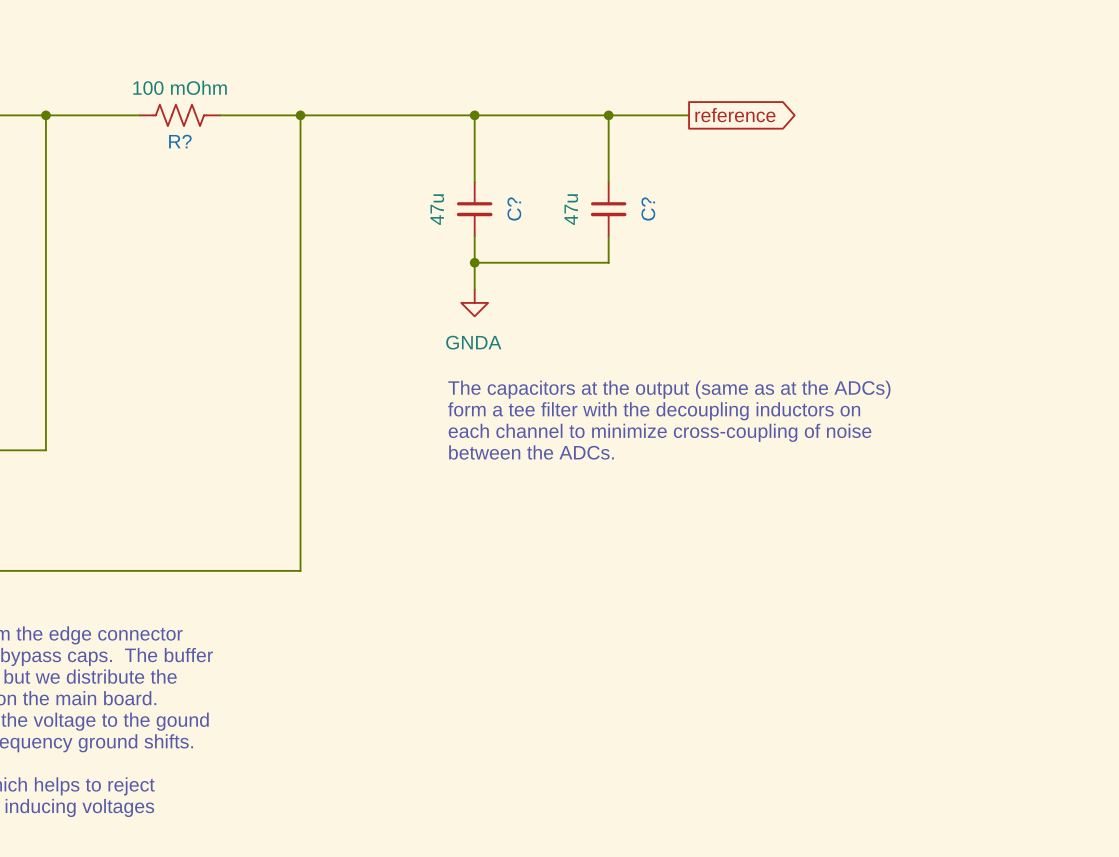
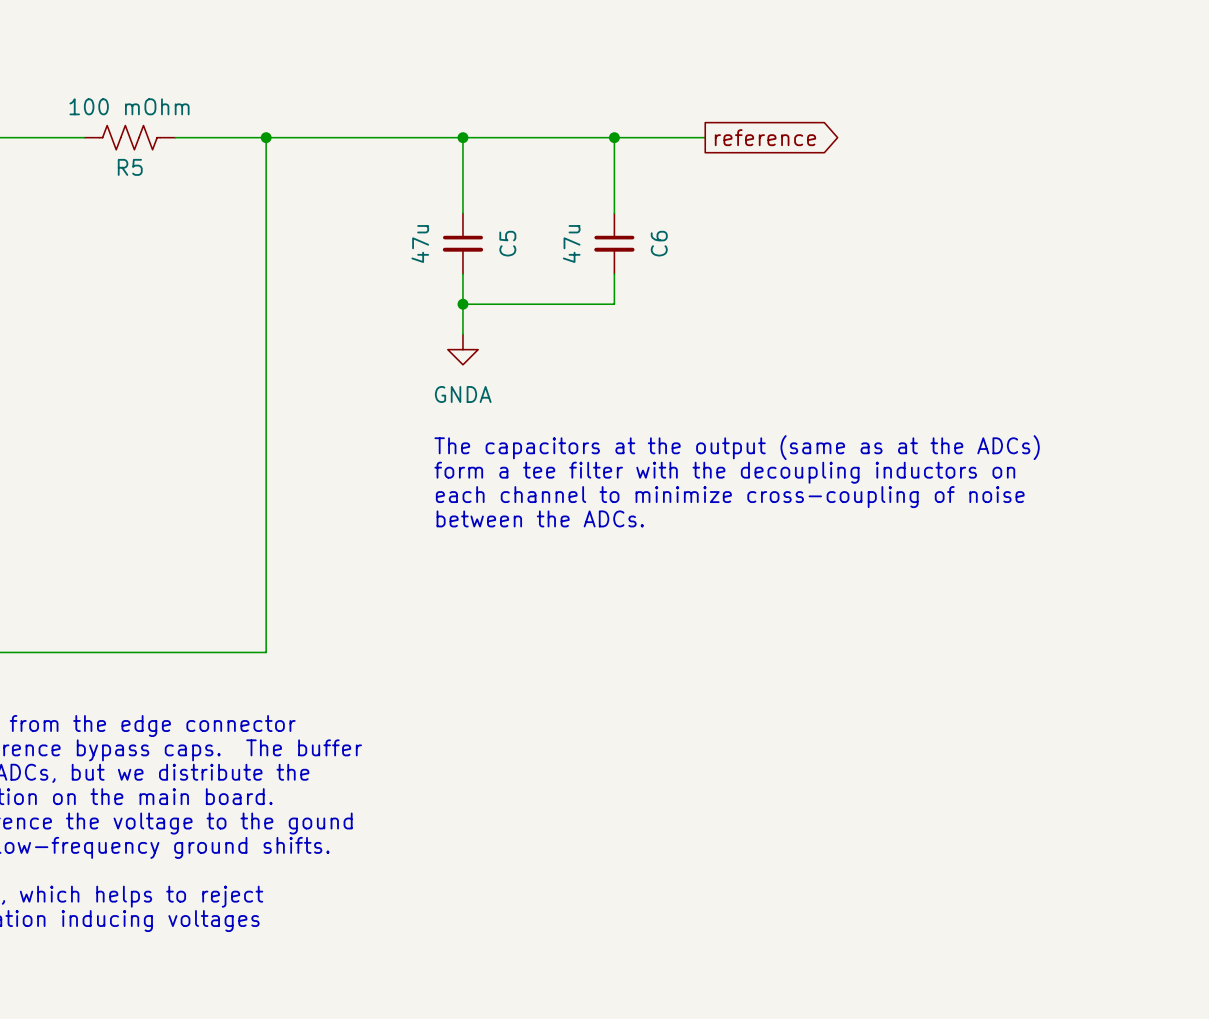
R? name: R? (180, 141) -> R5 (130, 167)
C? name: C? (514, 209) -> C5 (507, 243)
C? name: C? (648, 209) -> C6 (659, 243)

